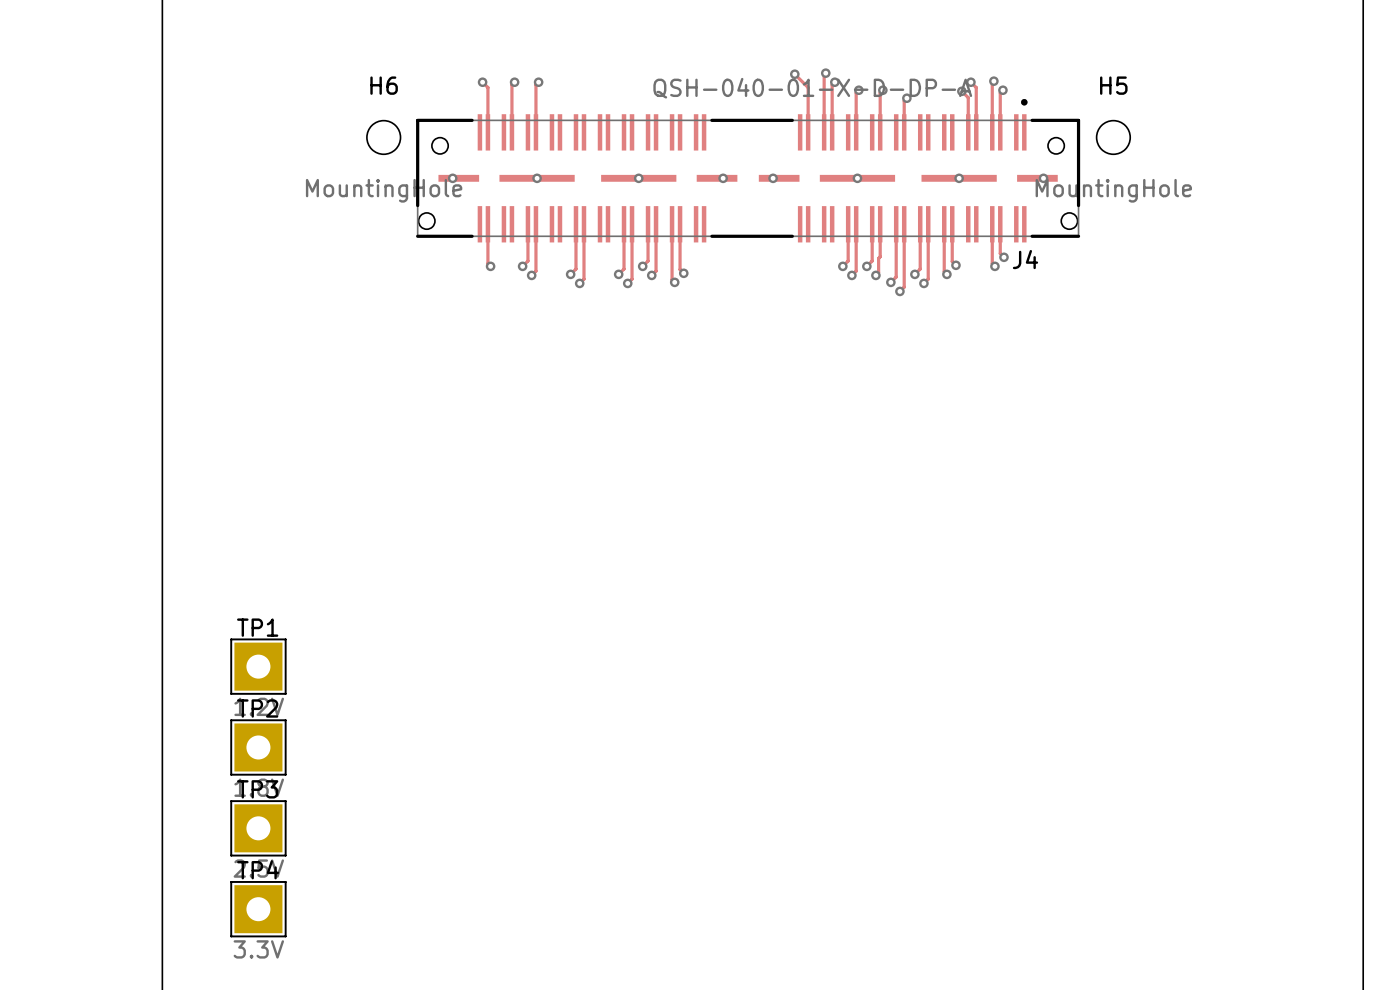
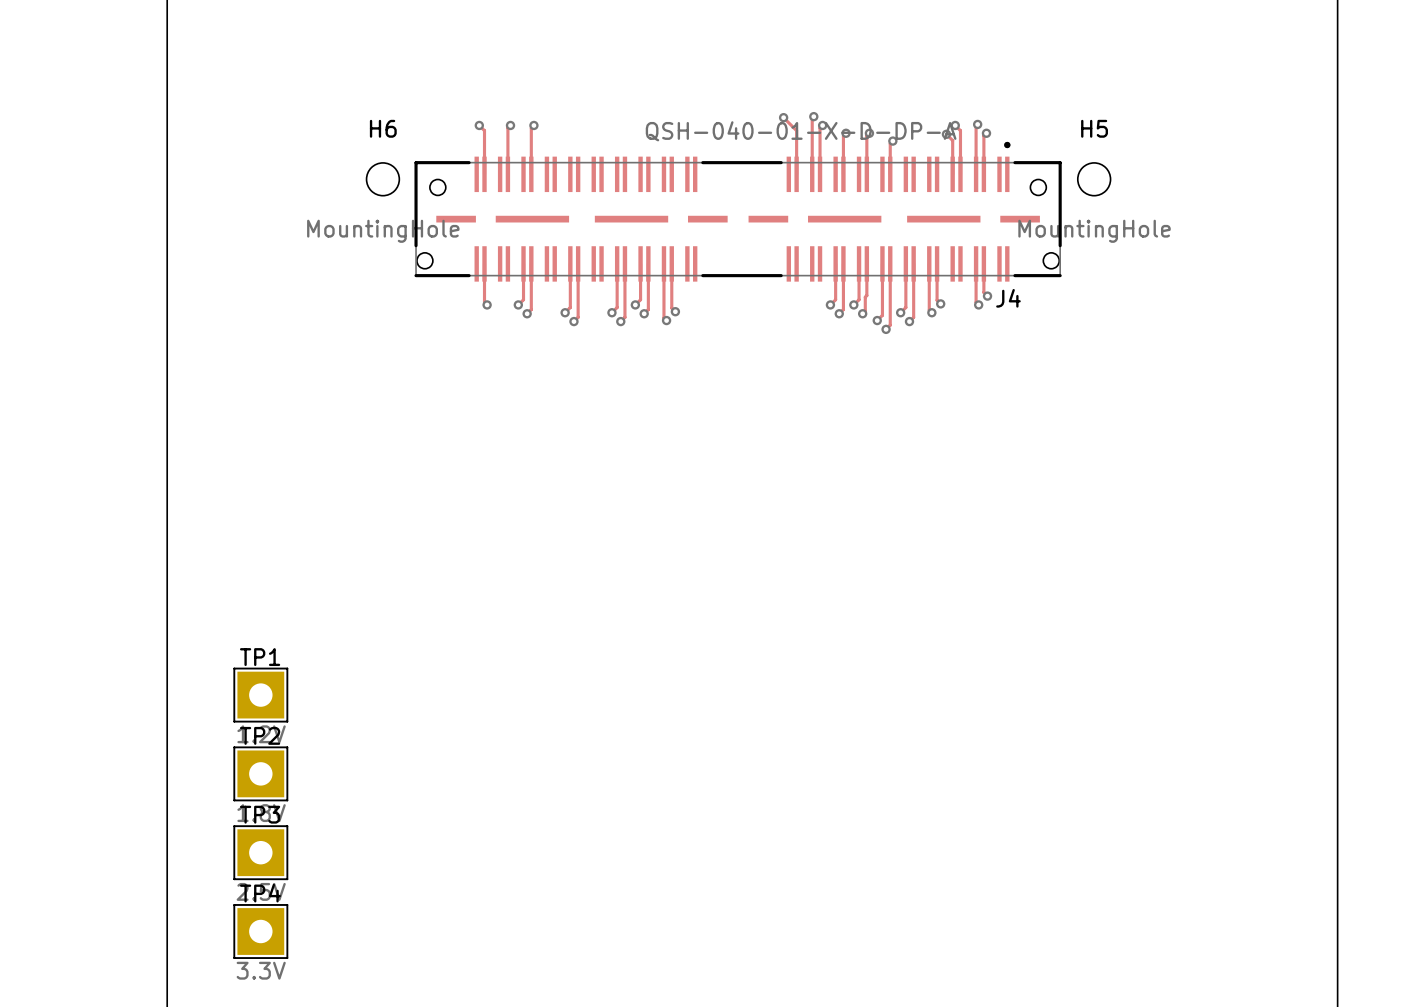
via: (452, 178) -> none
via: (537, 178) -> none
via: (638, 178) -> none
via: (723, 178) -> none
via: (773, 178) -> none
via: (857, 178) -> none
via: (959, 178) -> none
via: (1043, 178) -> none

